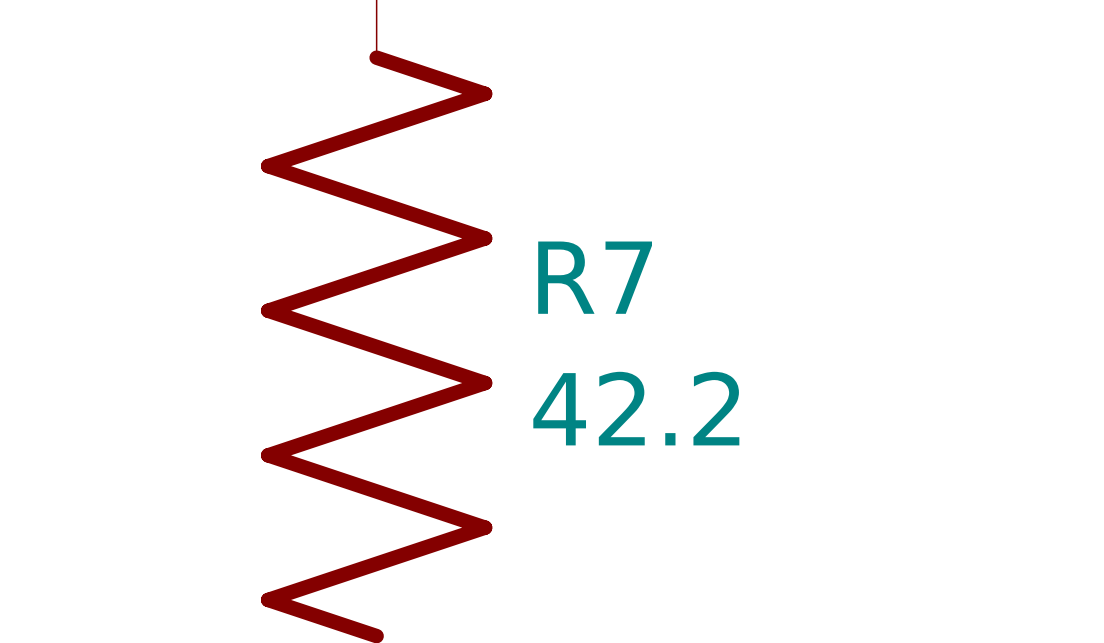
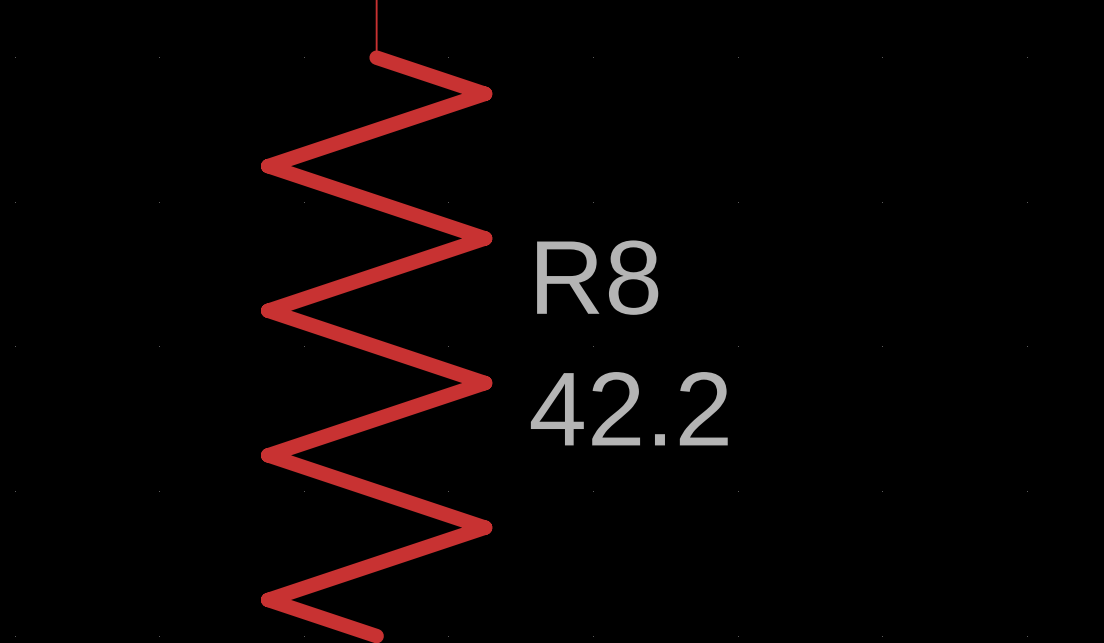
R7 name: R7 (595, 277) -> R8 (597, 277)

